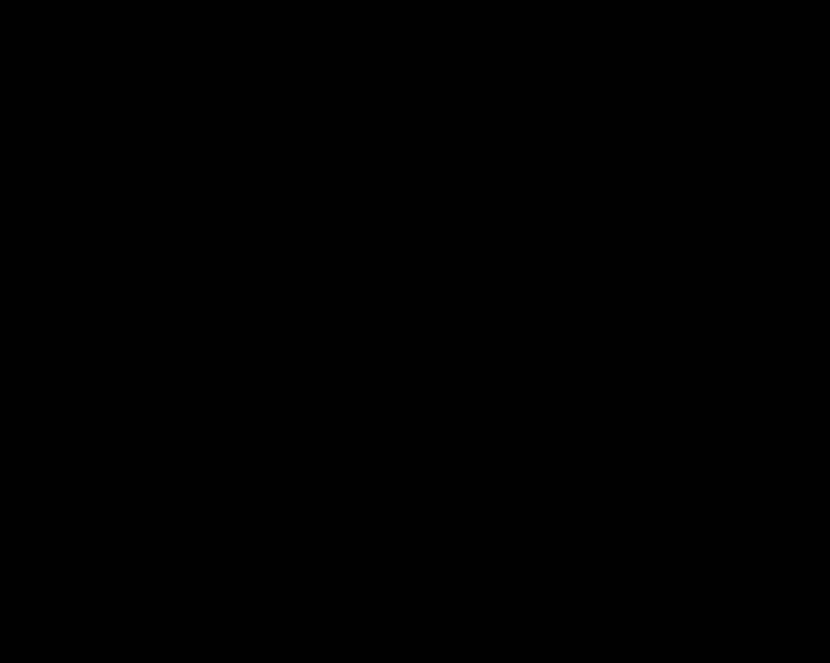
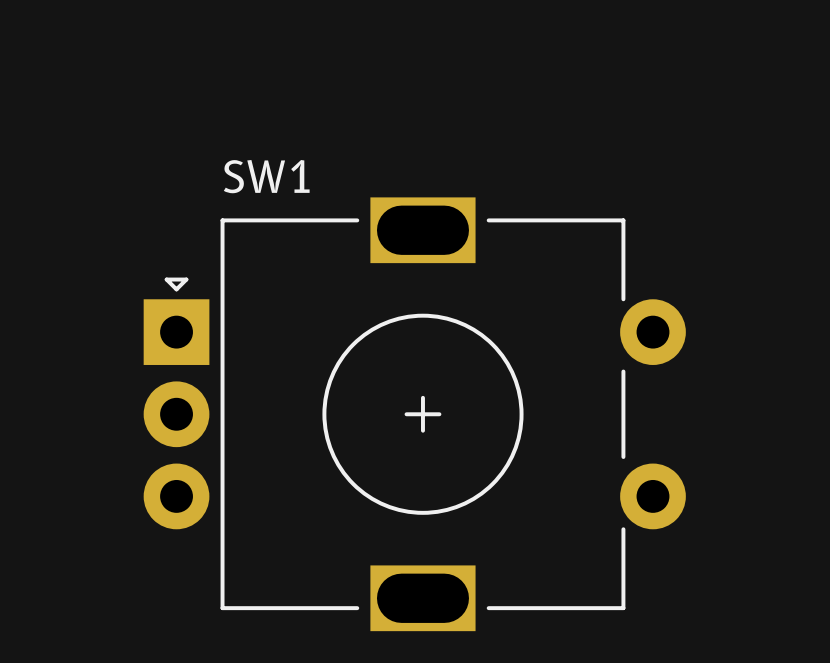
SW1: none -> (414, 414)

